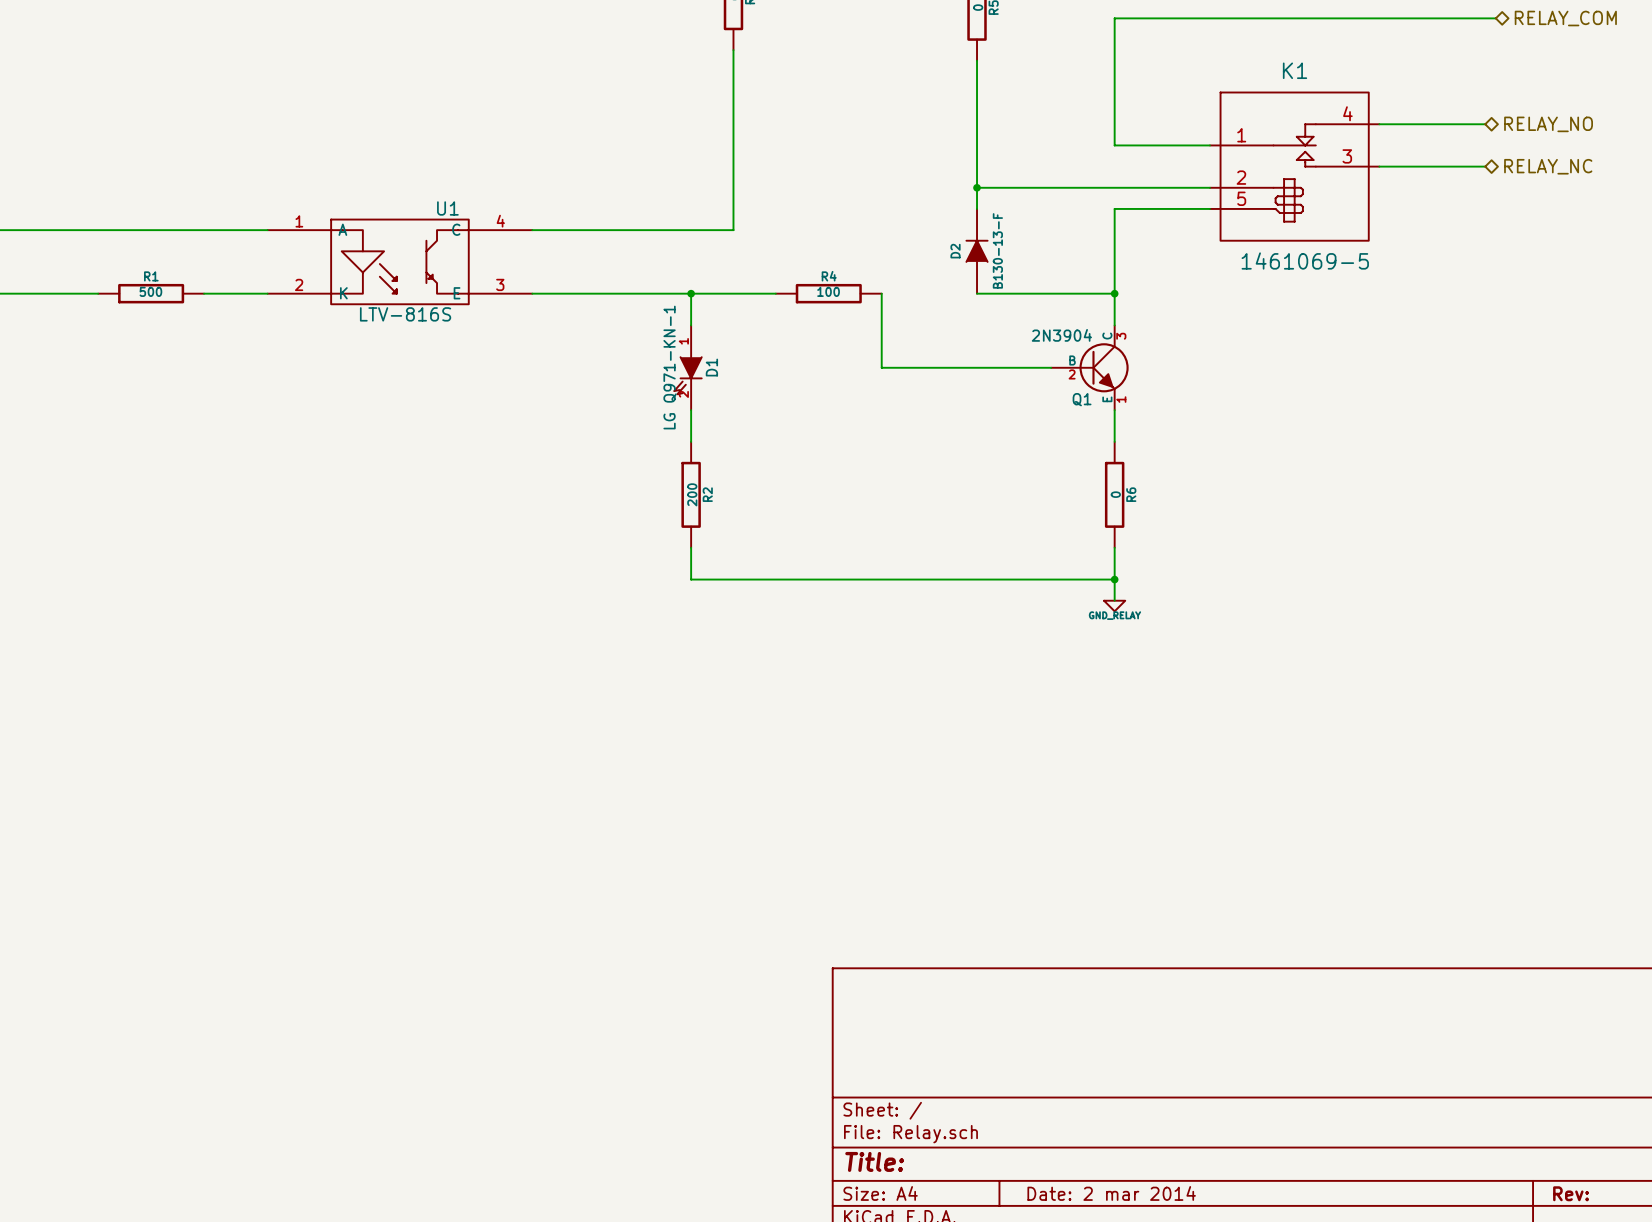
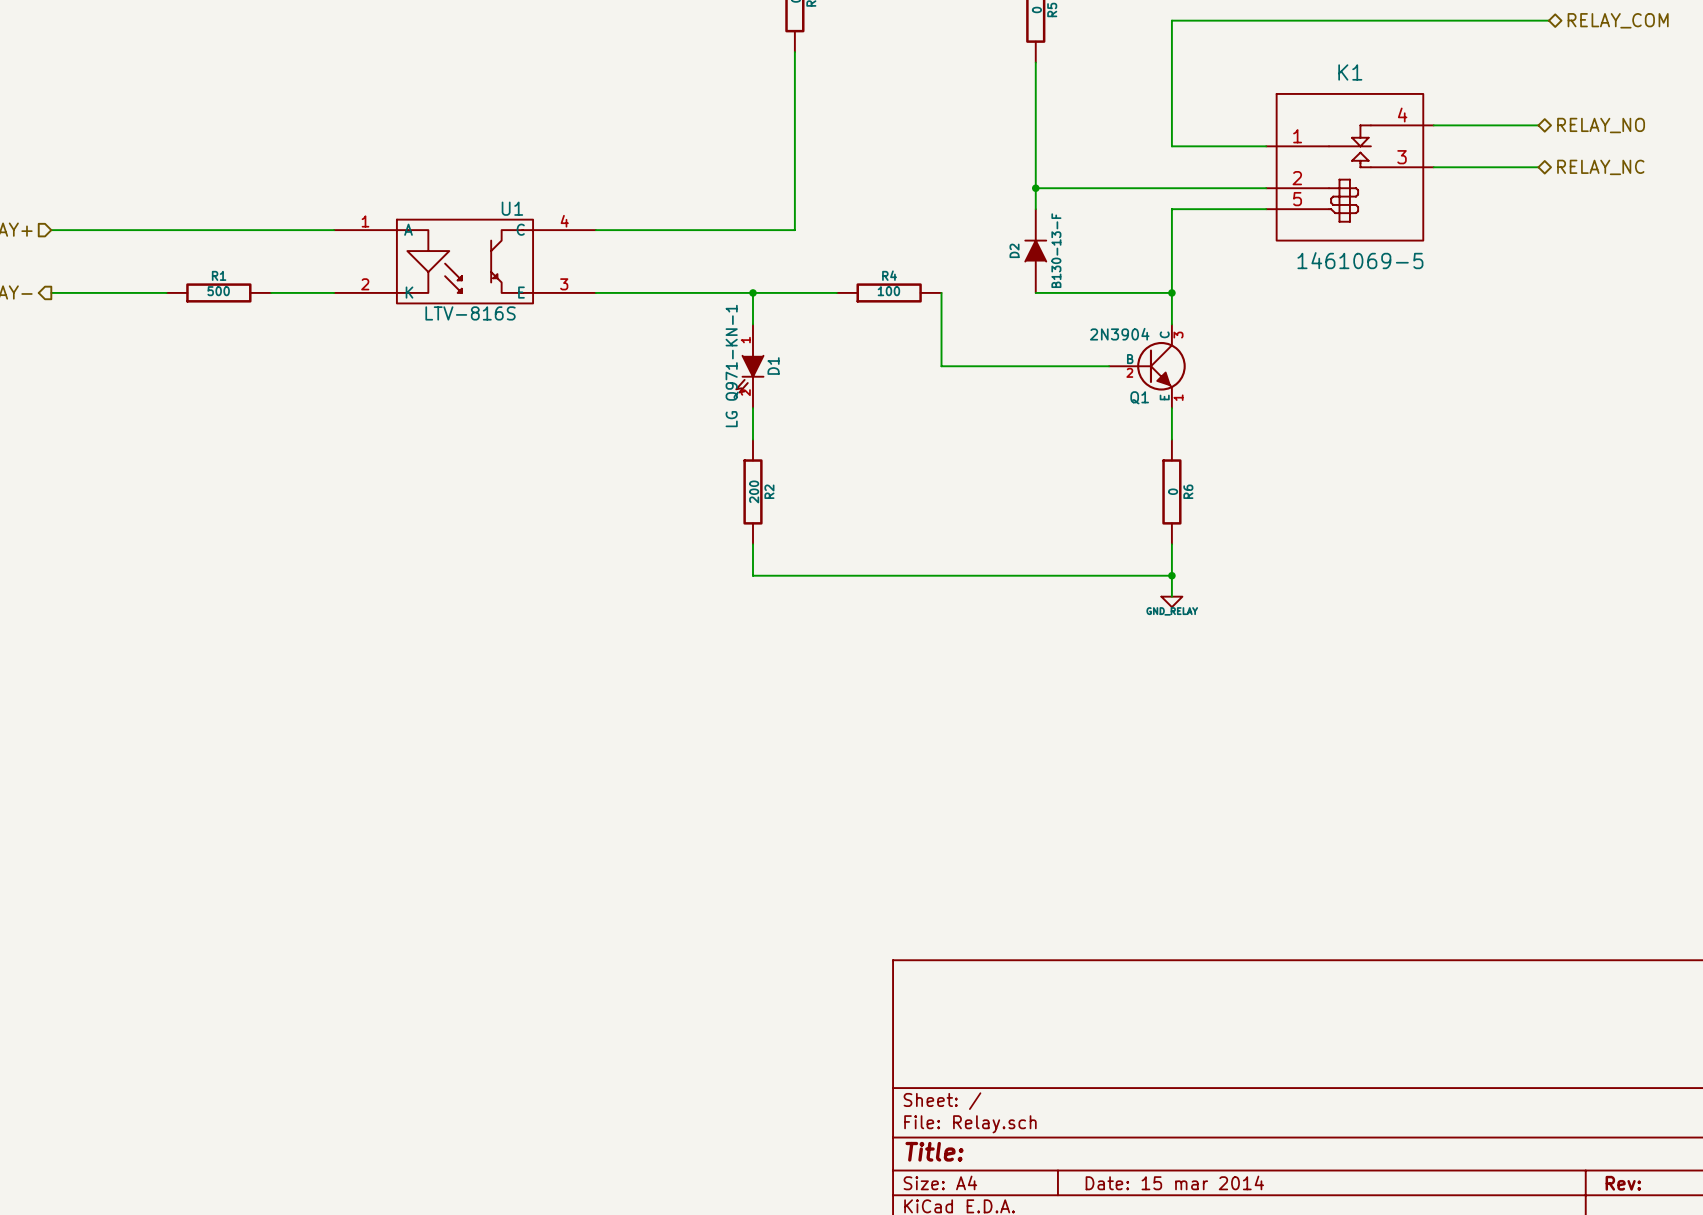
title block: Date: 2 mar 2014 (1111, 1193) -> Date: 15 mar 2014 (1174, 1182)

